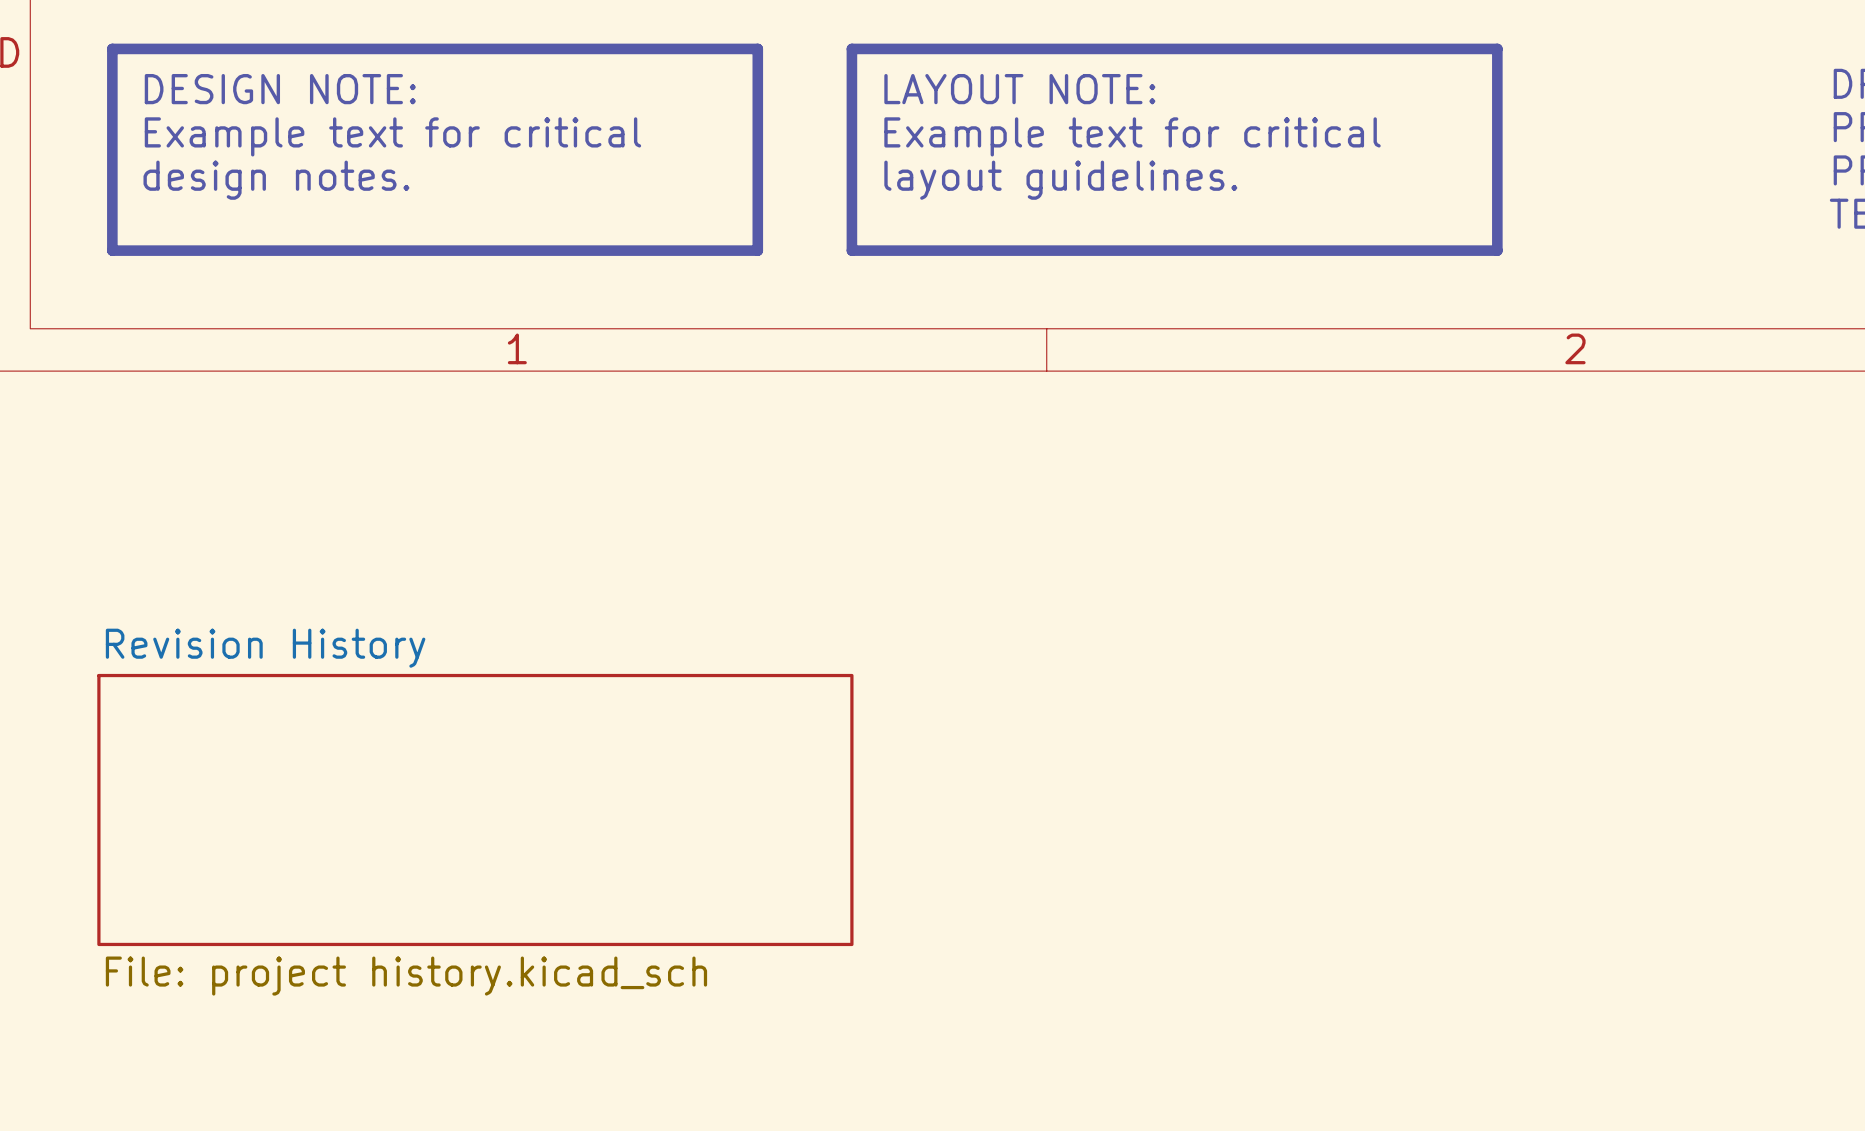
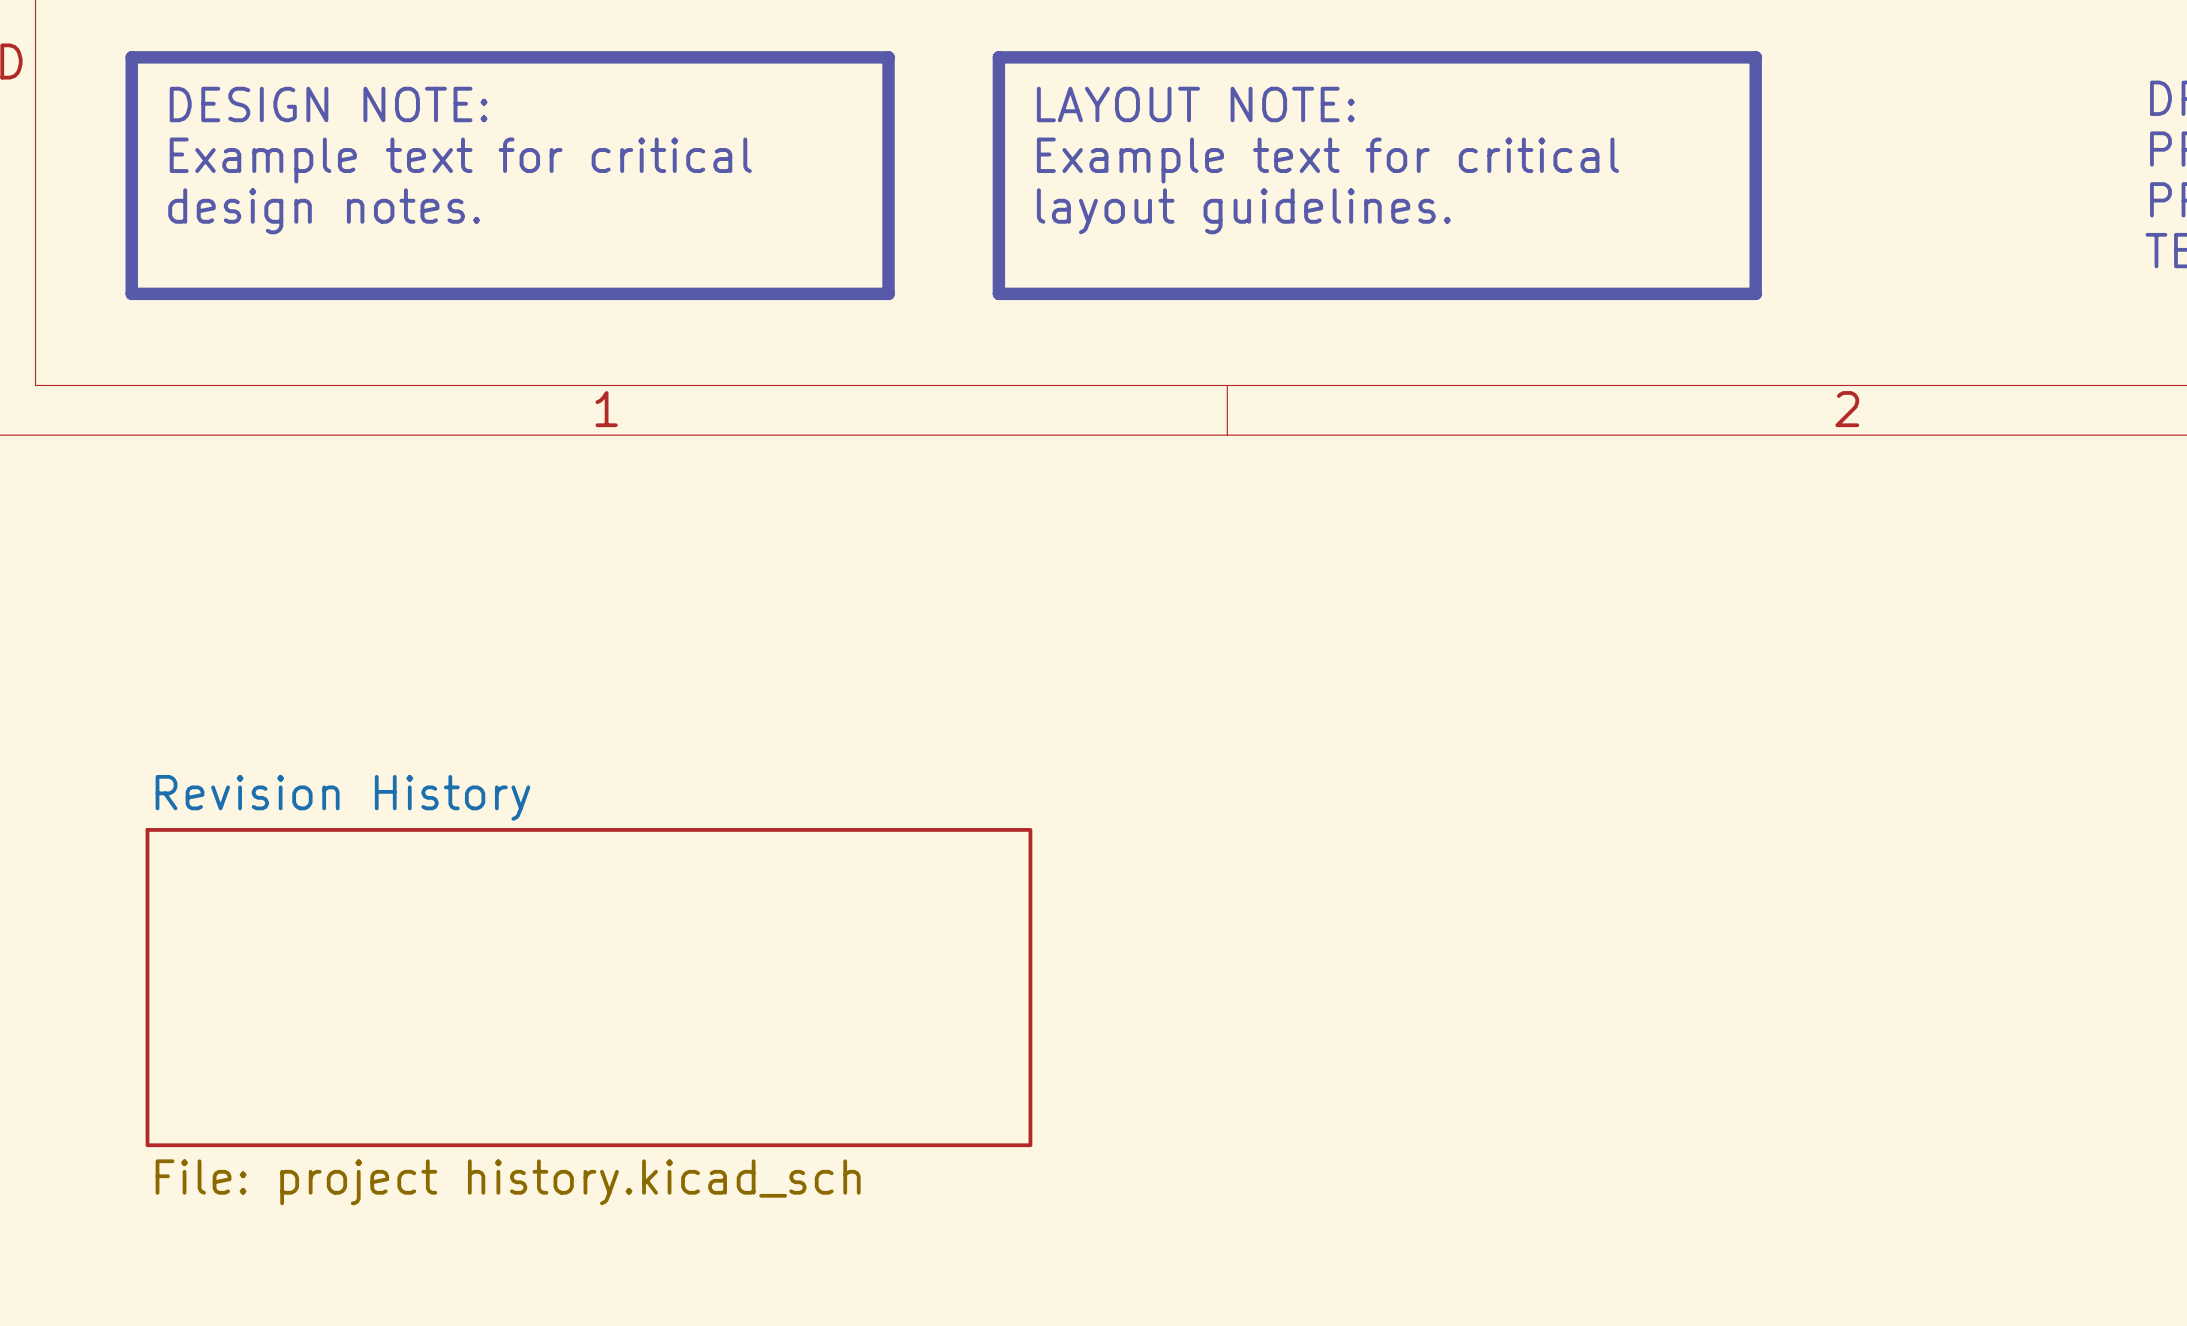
sheet Revision History position: (475, 809) -> (588, 987)

